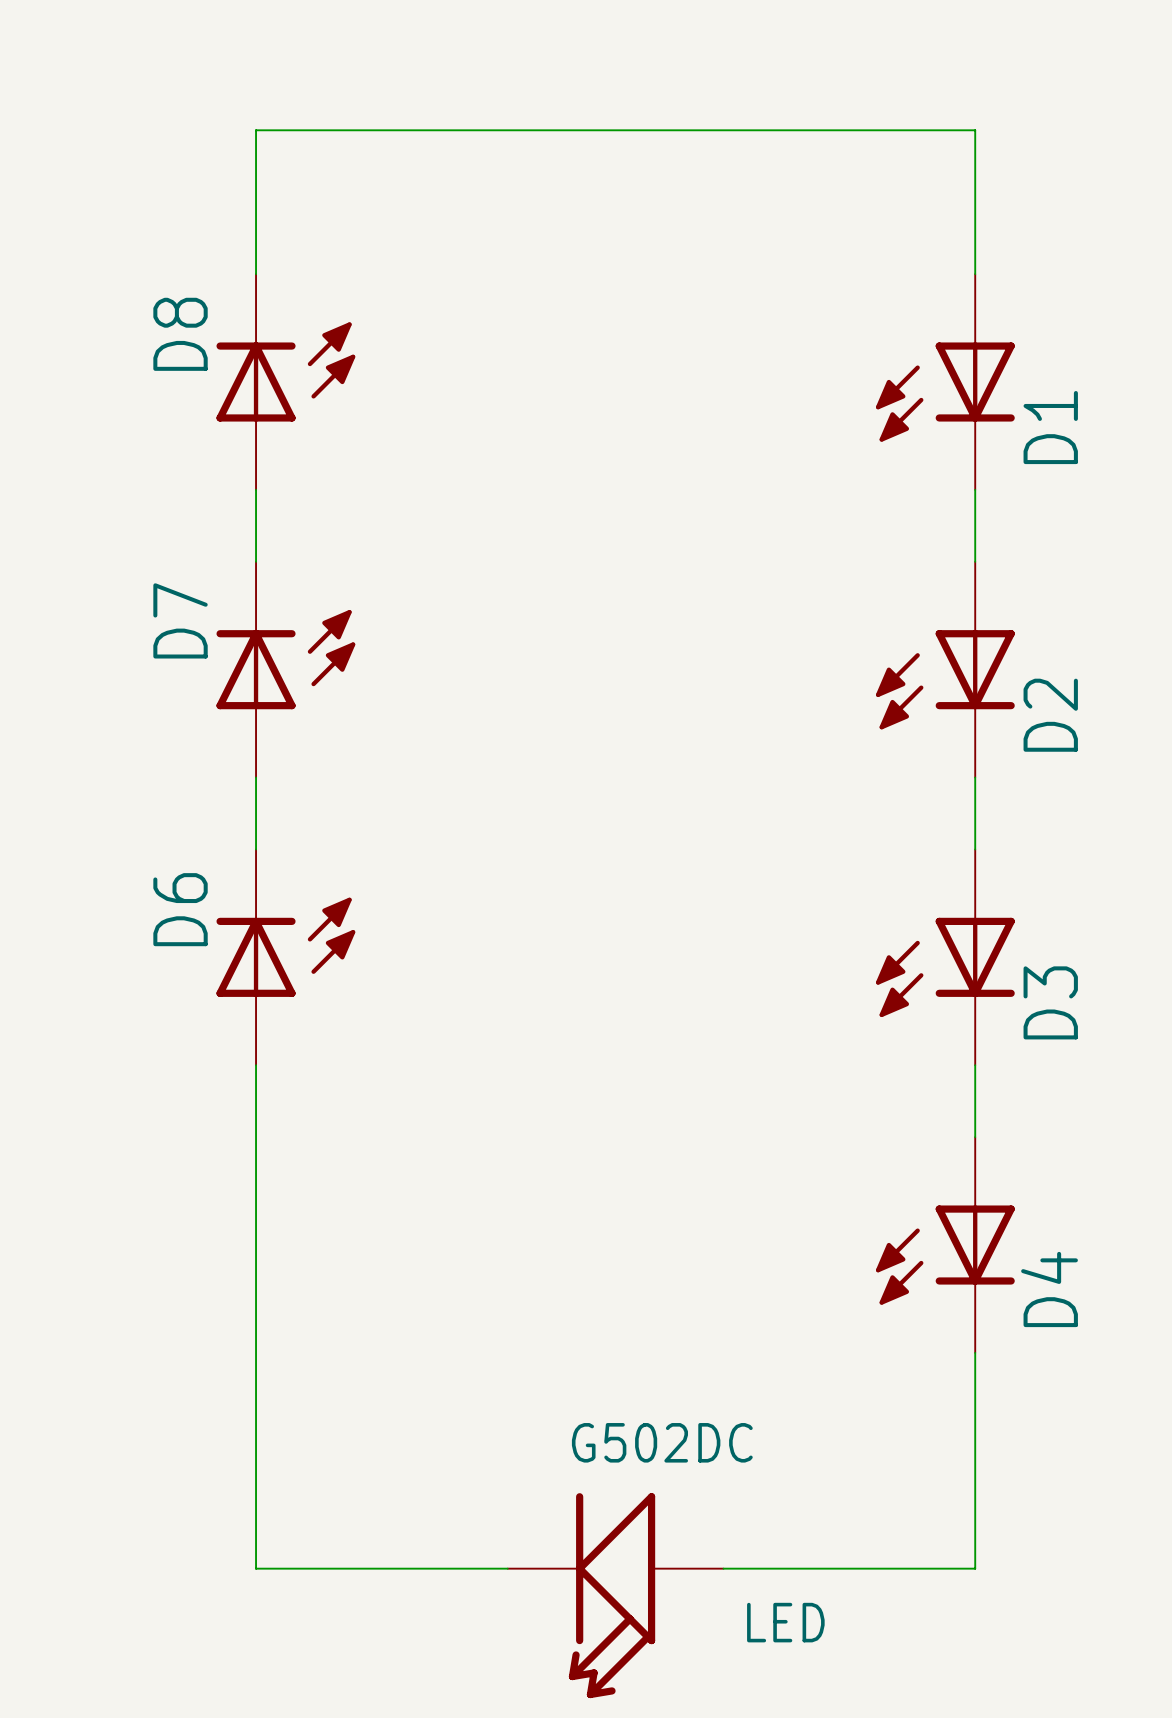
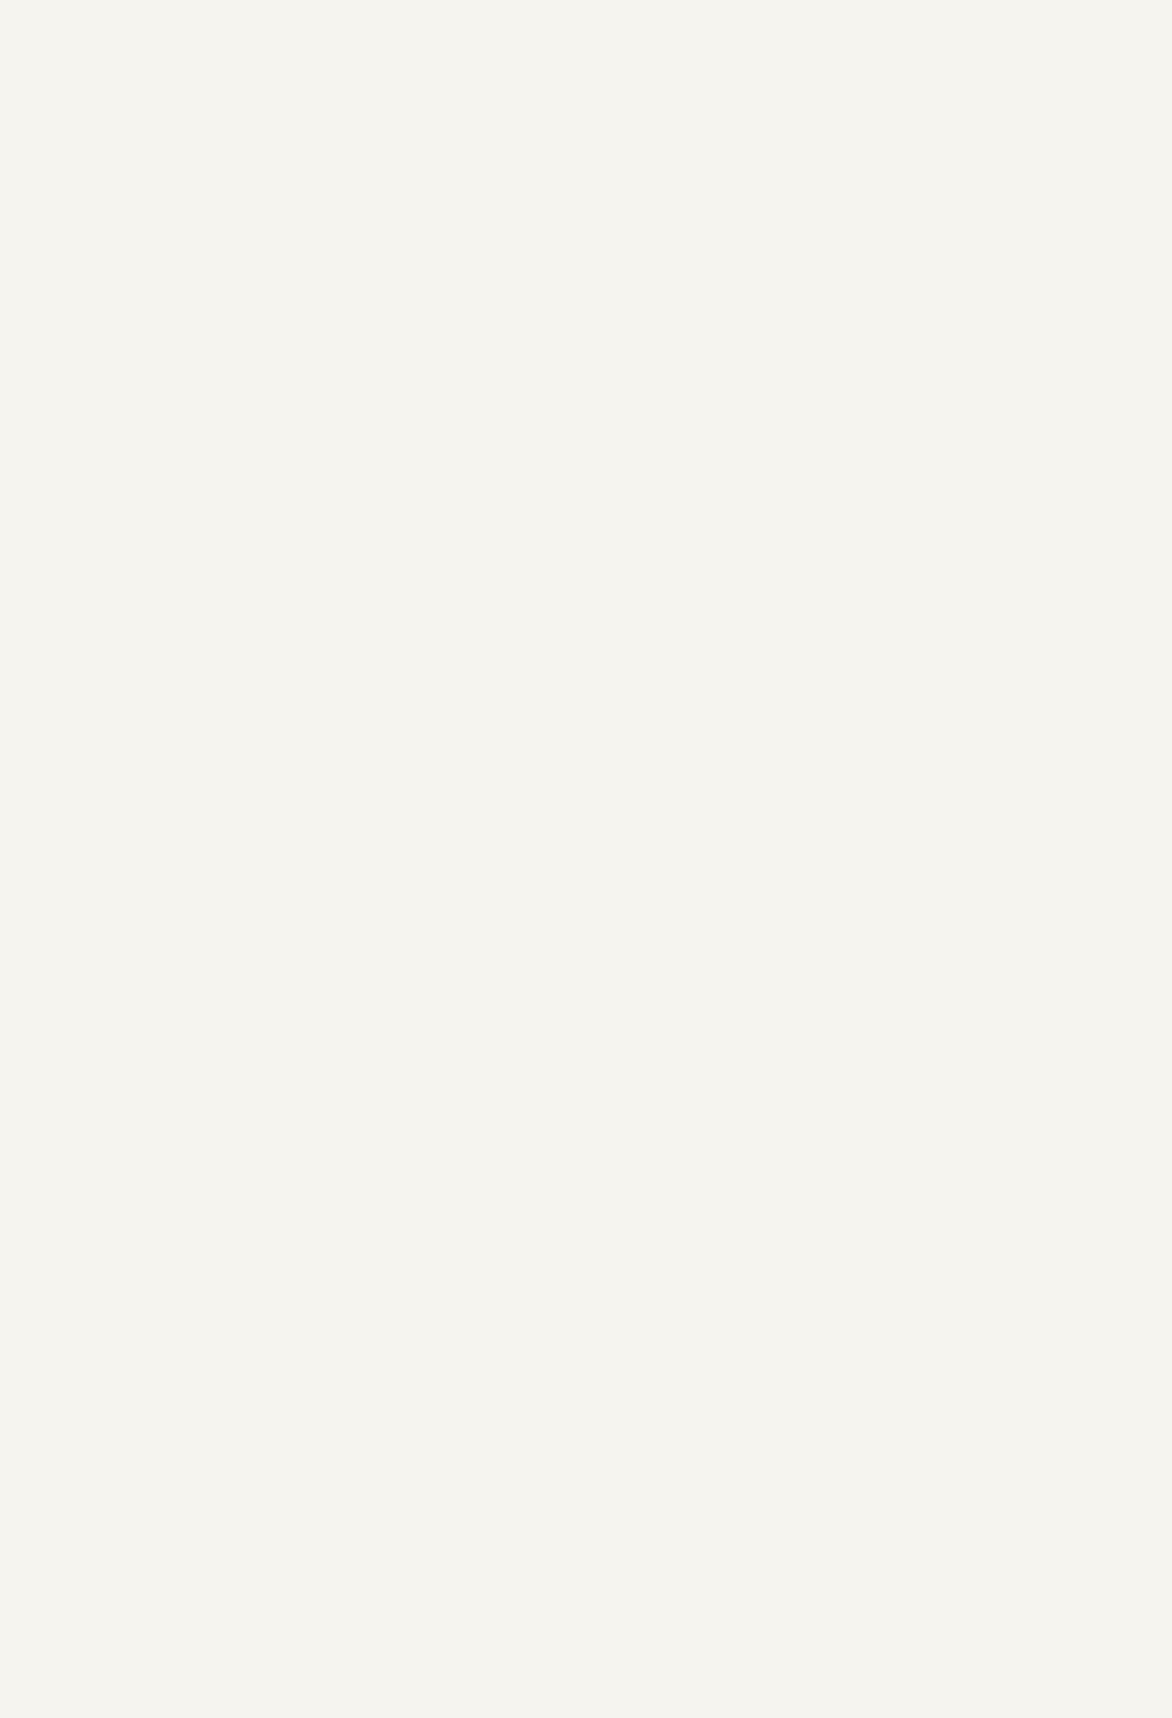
wire: (256, 274) (256, 130) (975, 130) (975, 274) -> none
D8: (285, 382) -> none
D1: (945, 382) -> none
wire: (256, 489) (256, 561) -> none
wire: (975, 489) (975, 561) -> none
D7: (285, 669) -> none
D2: (945, 669) -> none
wire: (256, 777) (256, 849) -> none
wire: (975, 777) (975, 849) -> none
D6: (285, 957) -> none
D3: (945, 957) -> none
wire: (256, 1065) (256, 1568) (507, 1568) -> none
wire: (975, 1065) (975, 1137) -> none
D4: (945, 1245) -> none
wire: (975, 1352) (975, 1568) (723, 1568) -> none
LED: G502DC (615, 1595) -> none

